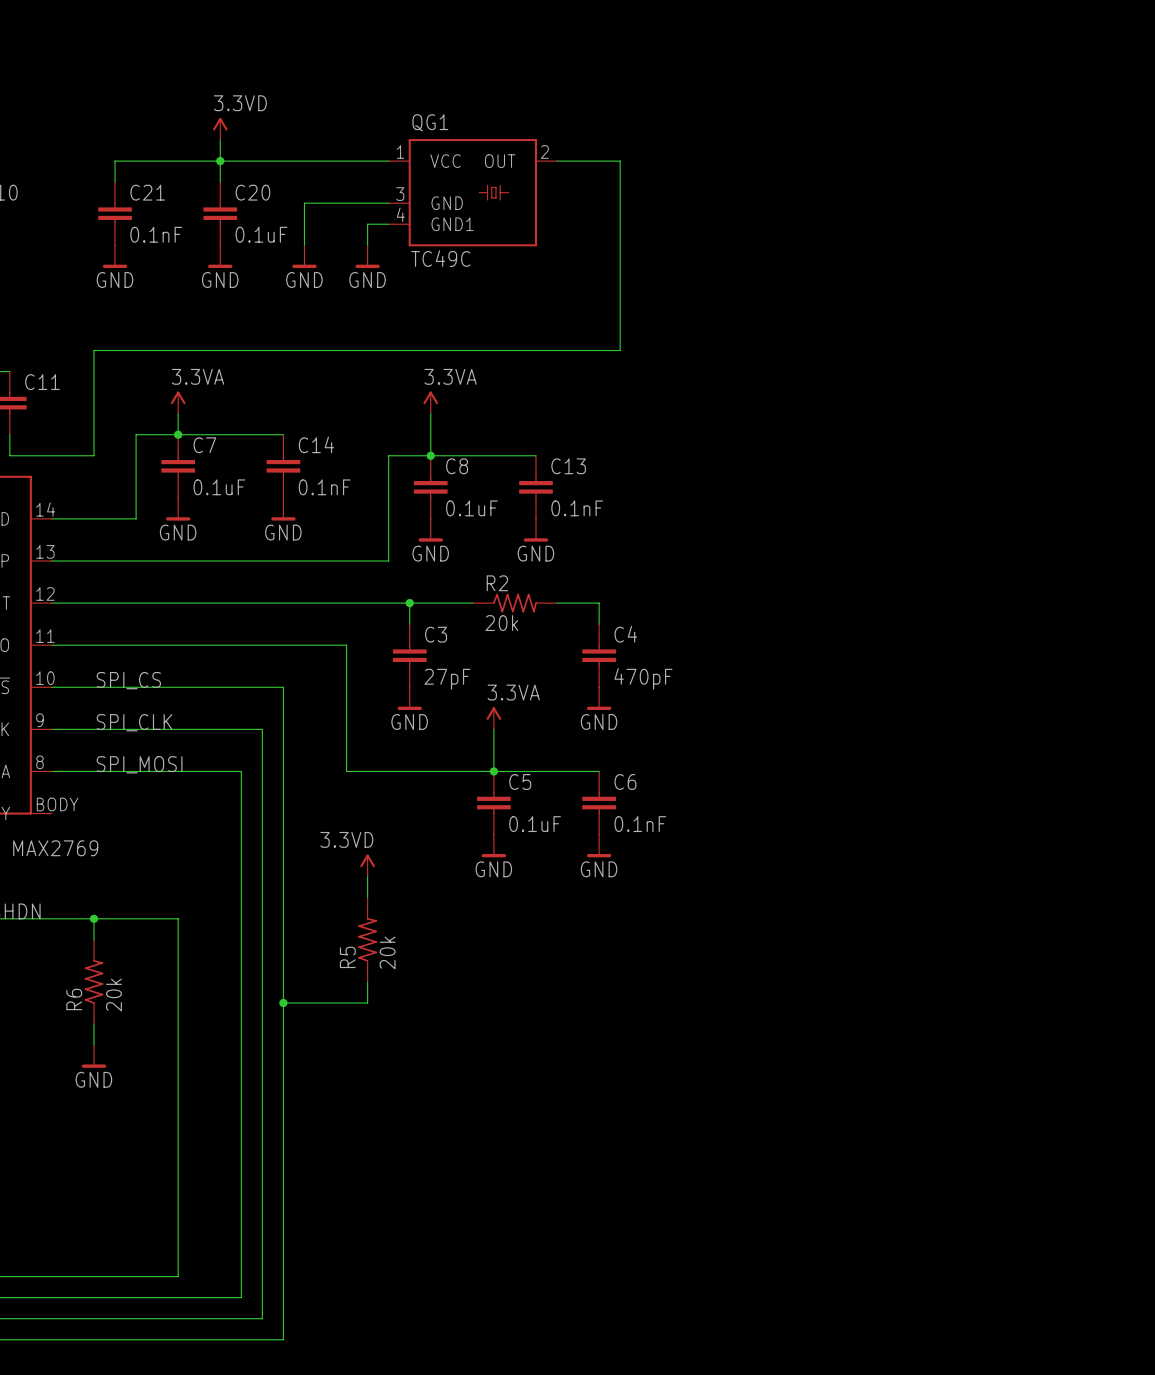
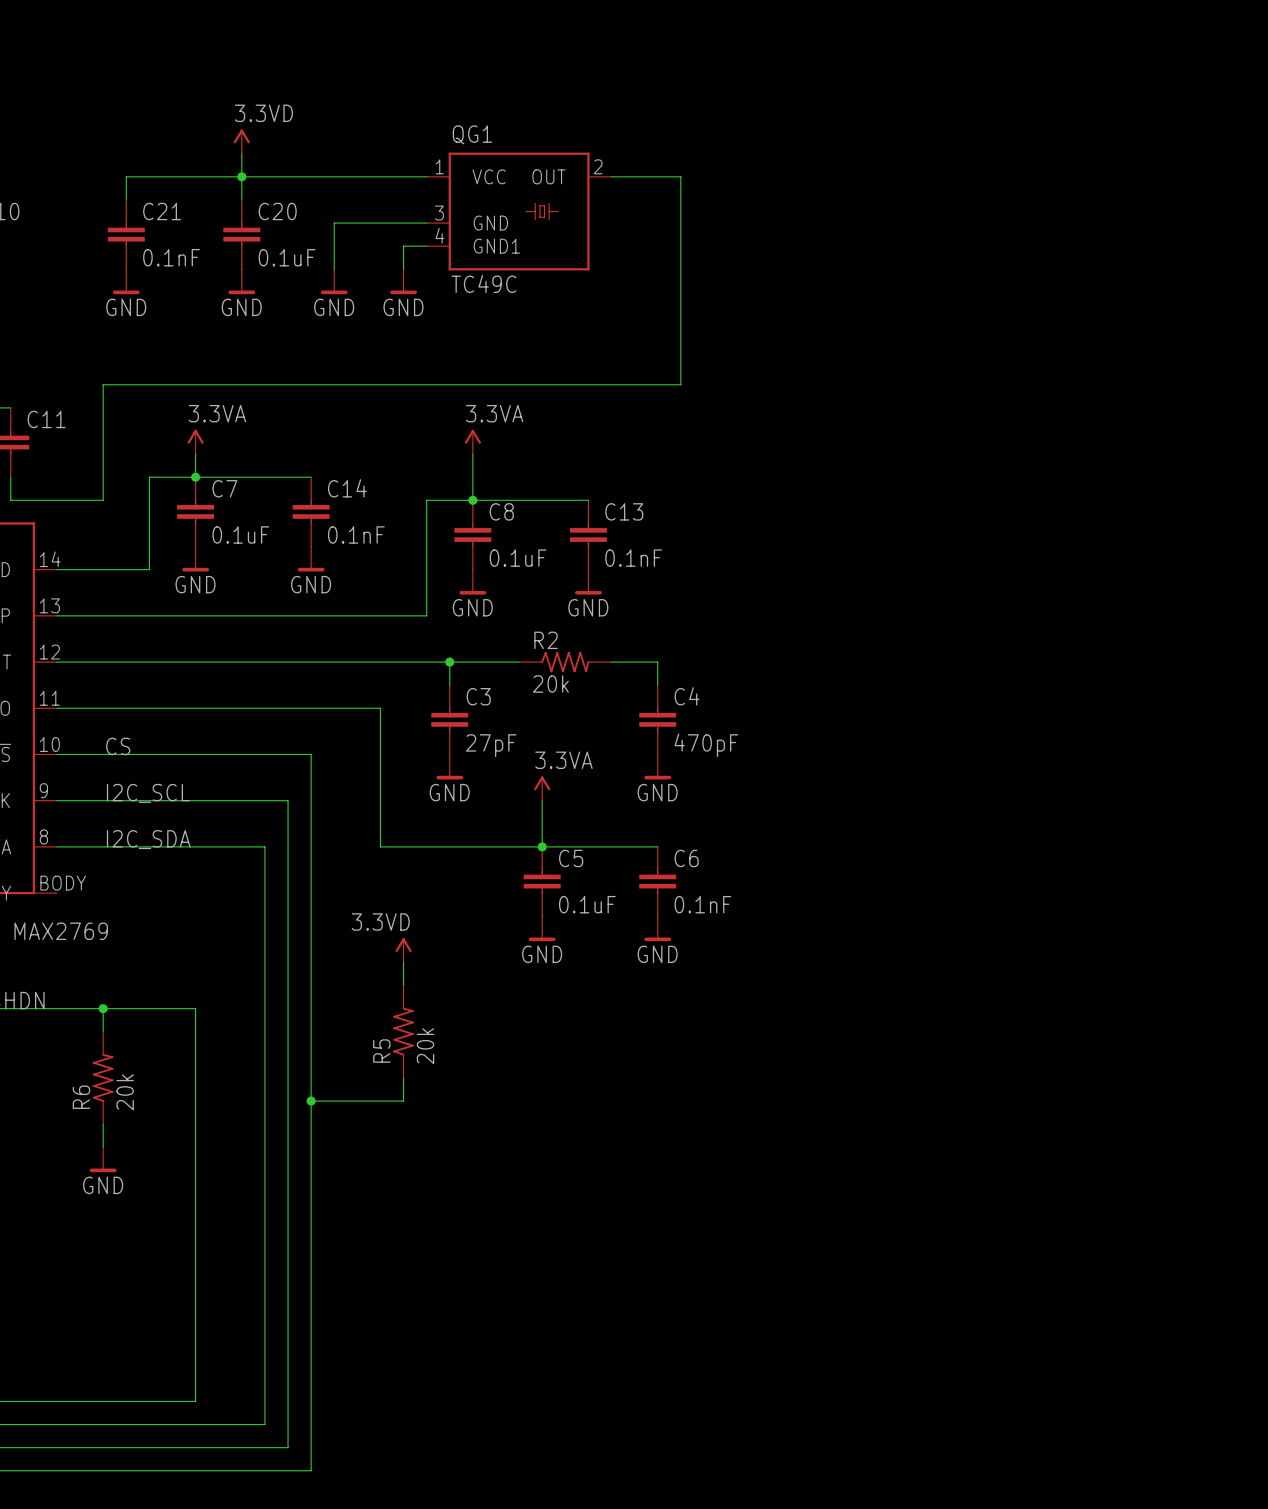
label: SPI_CS (128, 680) -> CS (118, 746)
label: SPI_CLK (134, 722) -> I2C_SCL (148, 793)
label: SPI_MOSI (139, 764) -> I2C_SDA (148, 839)

